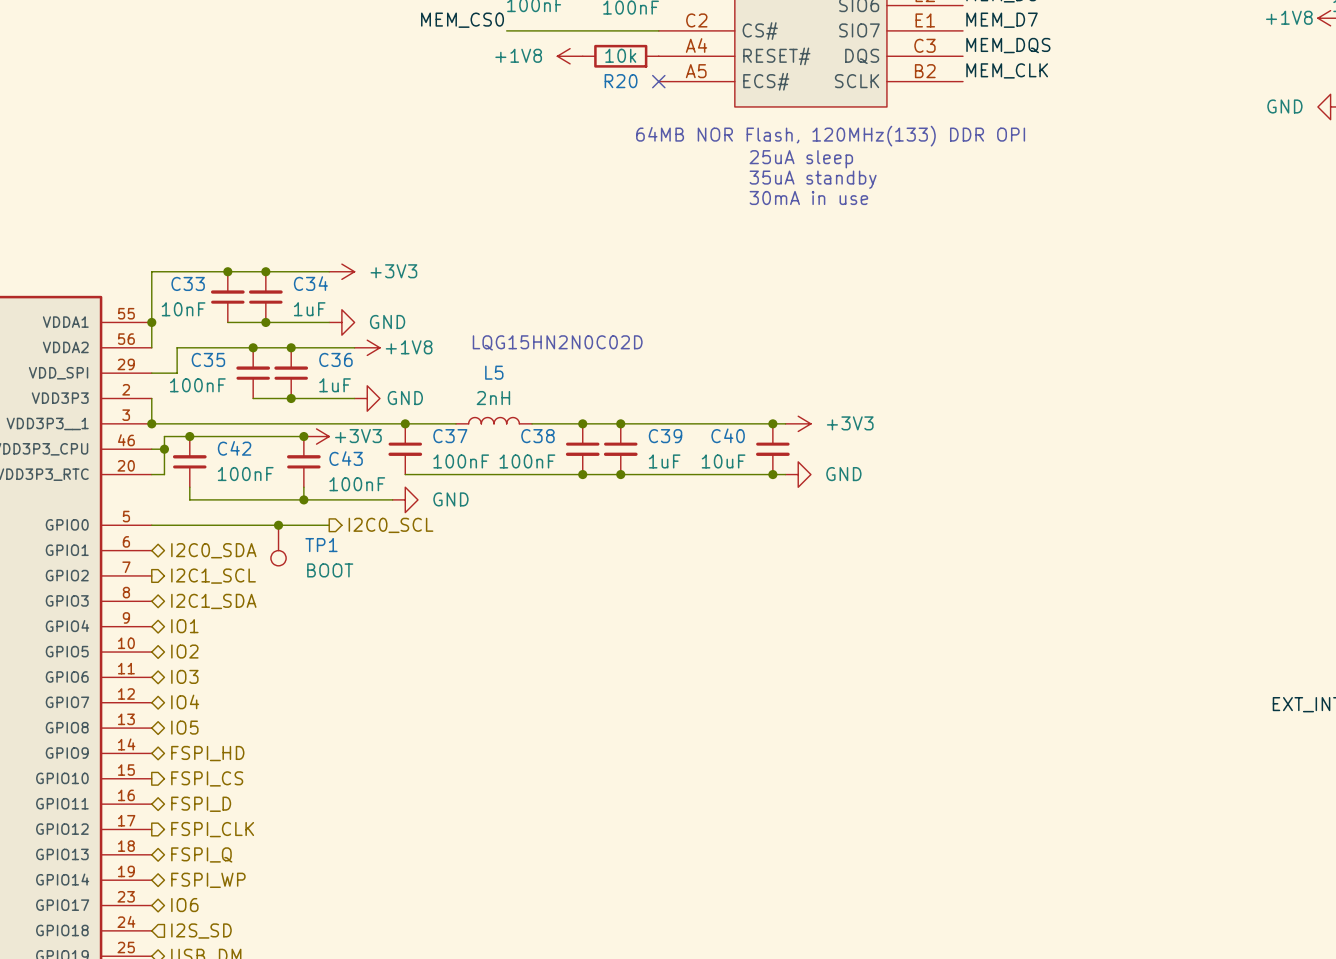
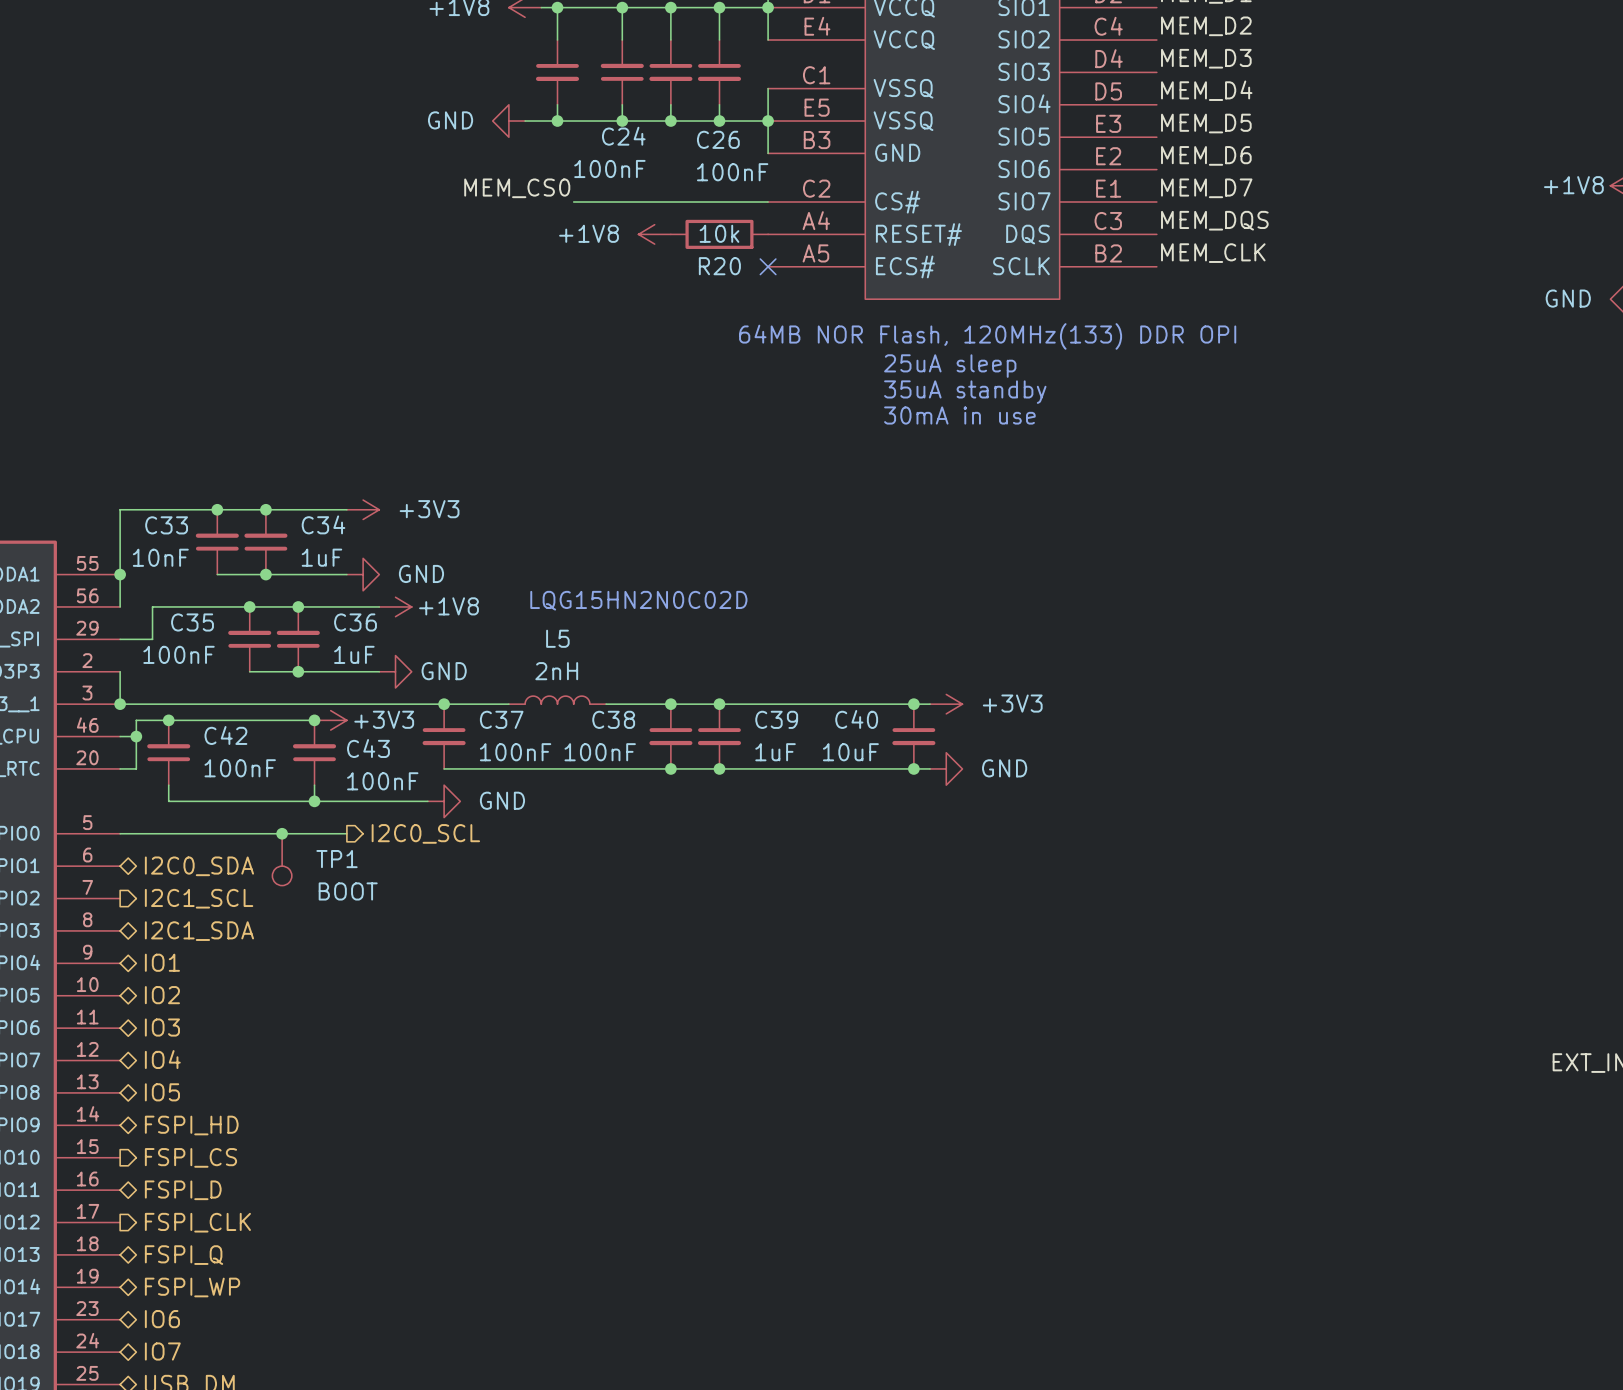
hierarchical label shape: input (201, 931) -> bidirectional (162, 1351)
hierarchical label: I2S_SD (201, 931) -> IO7 (162, 1351)

